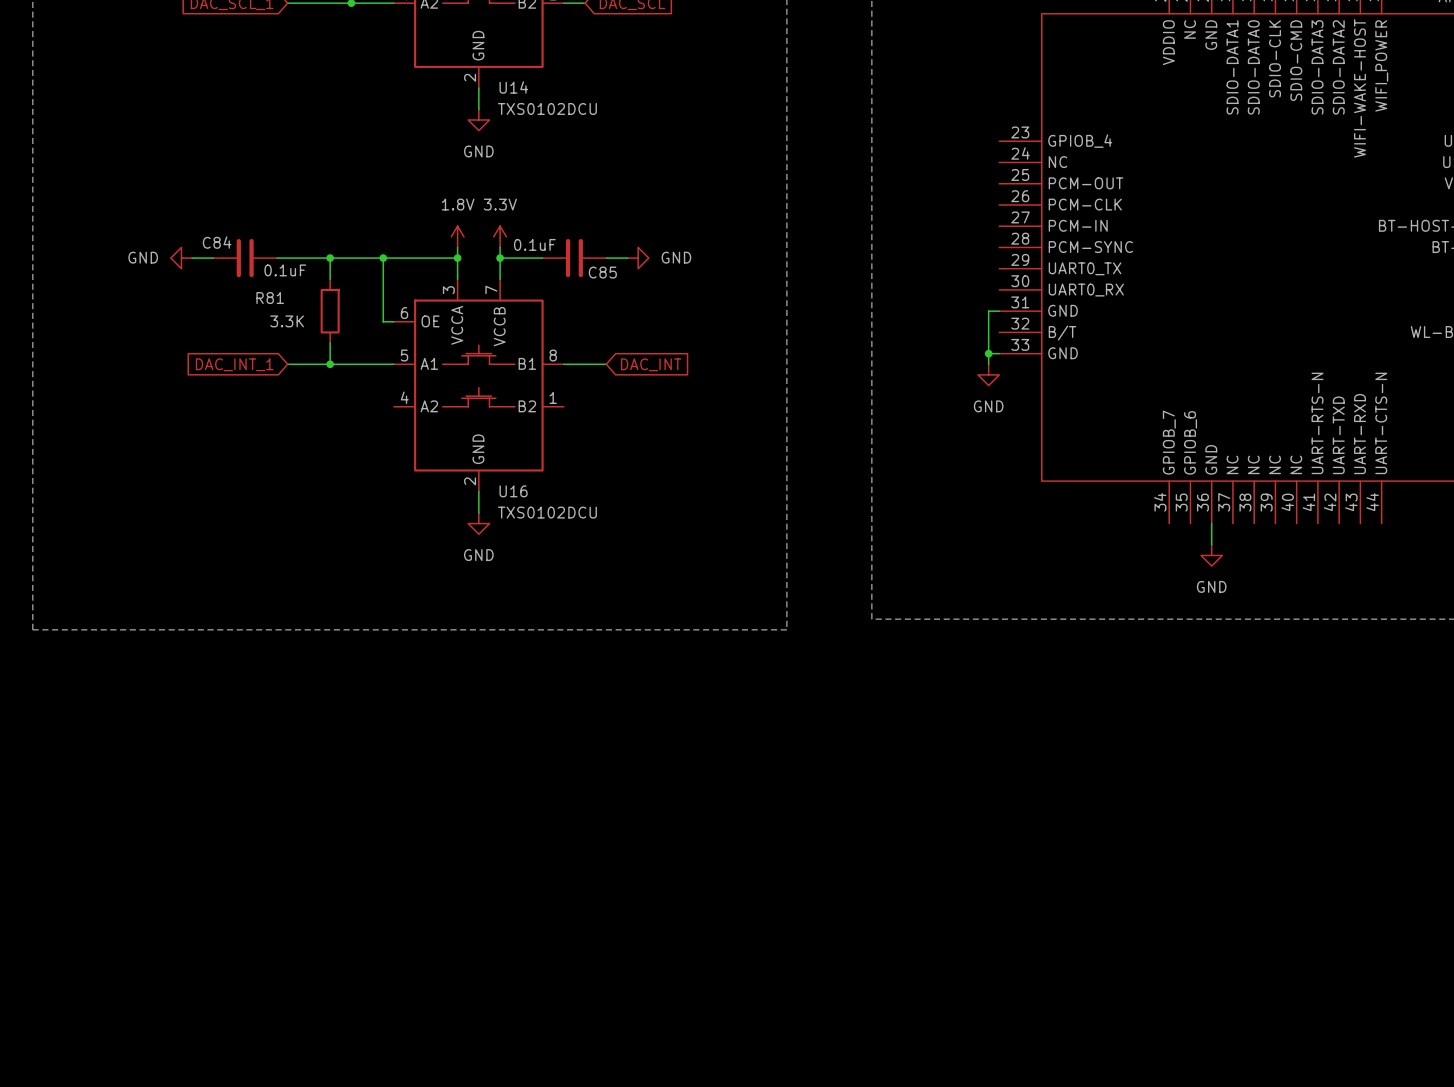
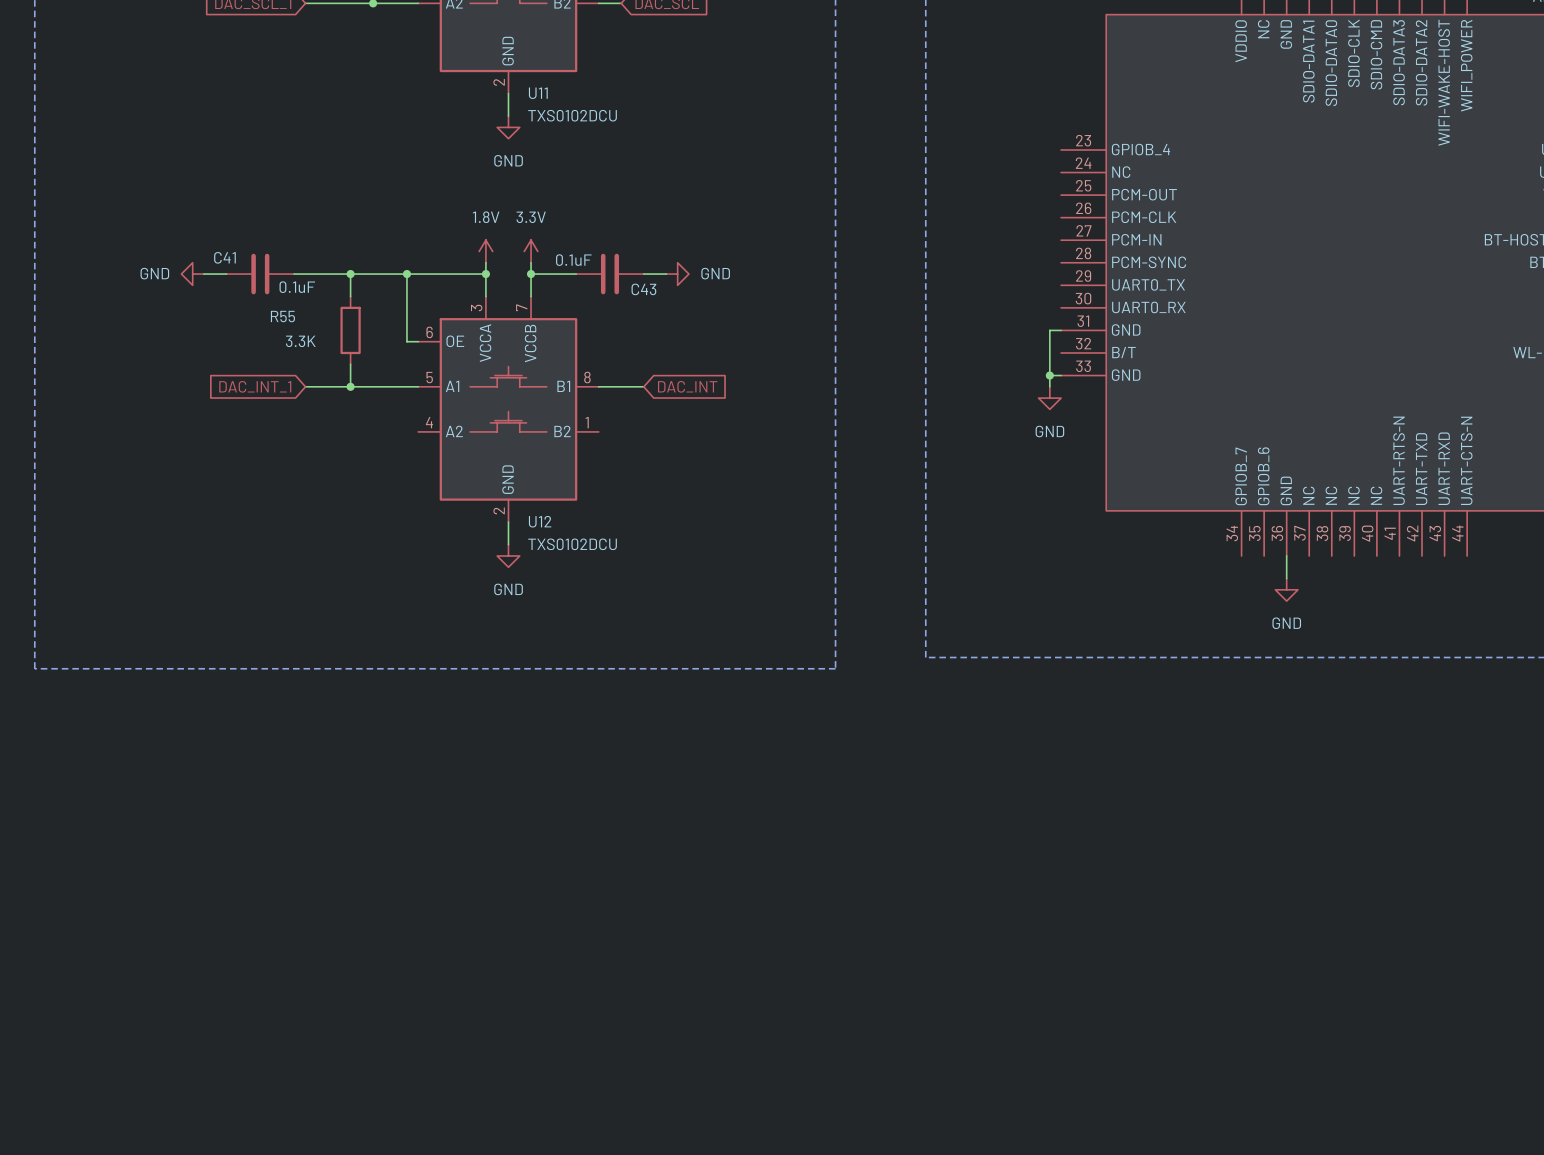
U14 name: U14 (513, 87) -> U11 (538, 93)
C84 name: C84 (217, 242) -> C41 (224, 257)
C85 name: C85 (602, 272) -> C43 (643, 289)
R81 name: R81 (270, 298) -> R55 (282, 316)
U16 name: U16 (513, 491) -> U12 (540, 521)

